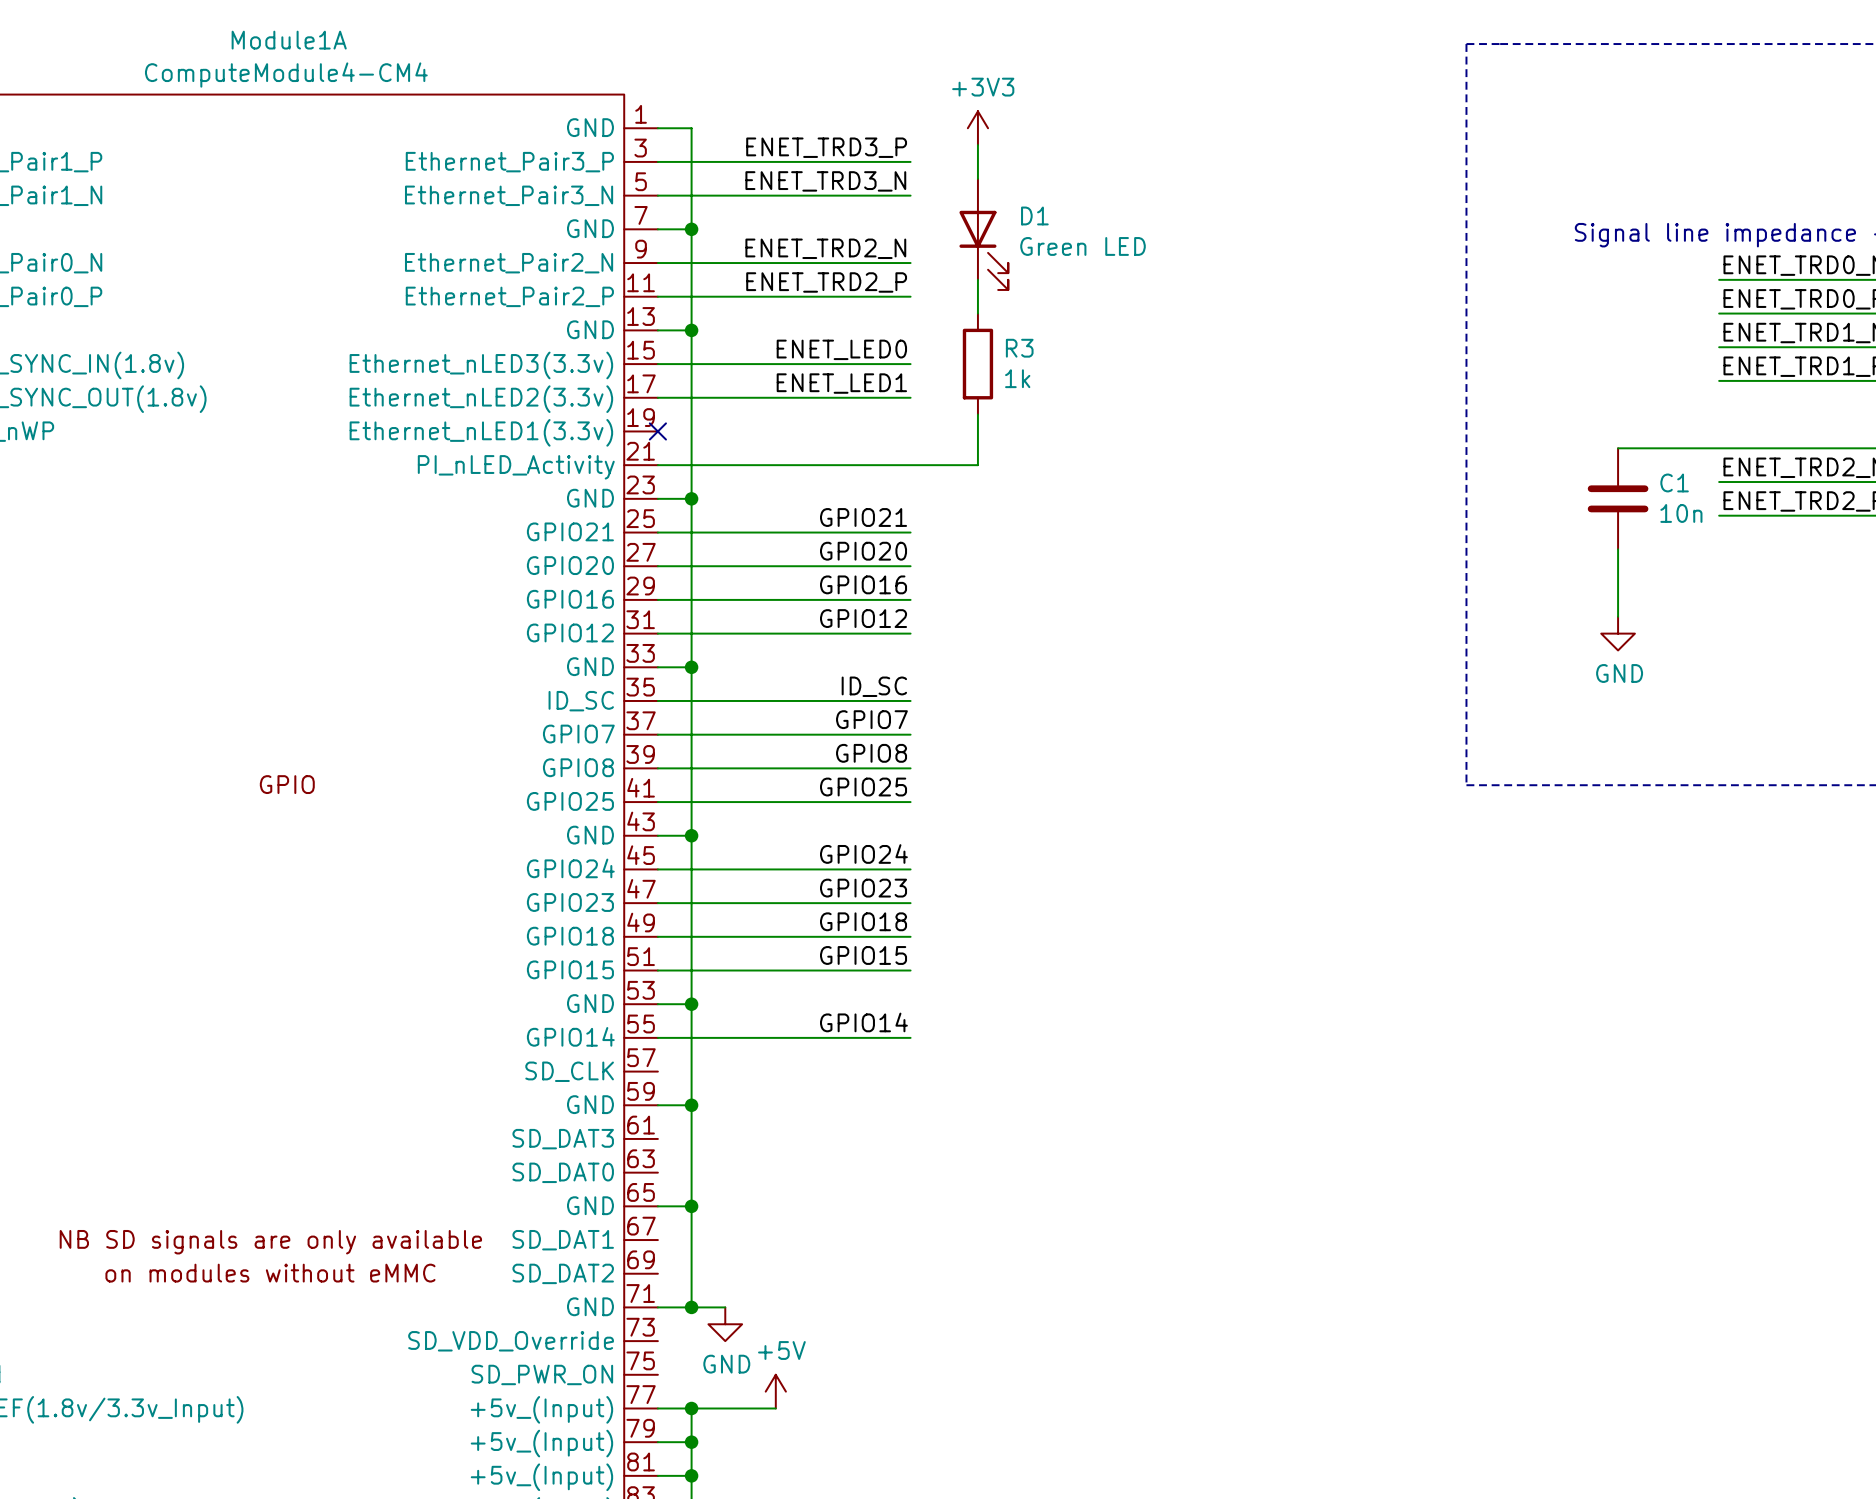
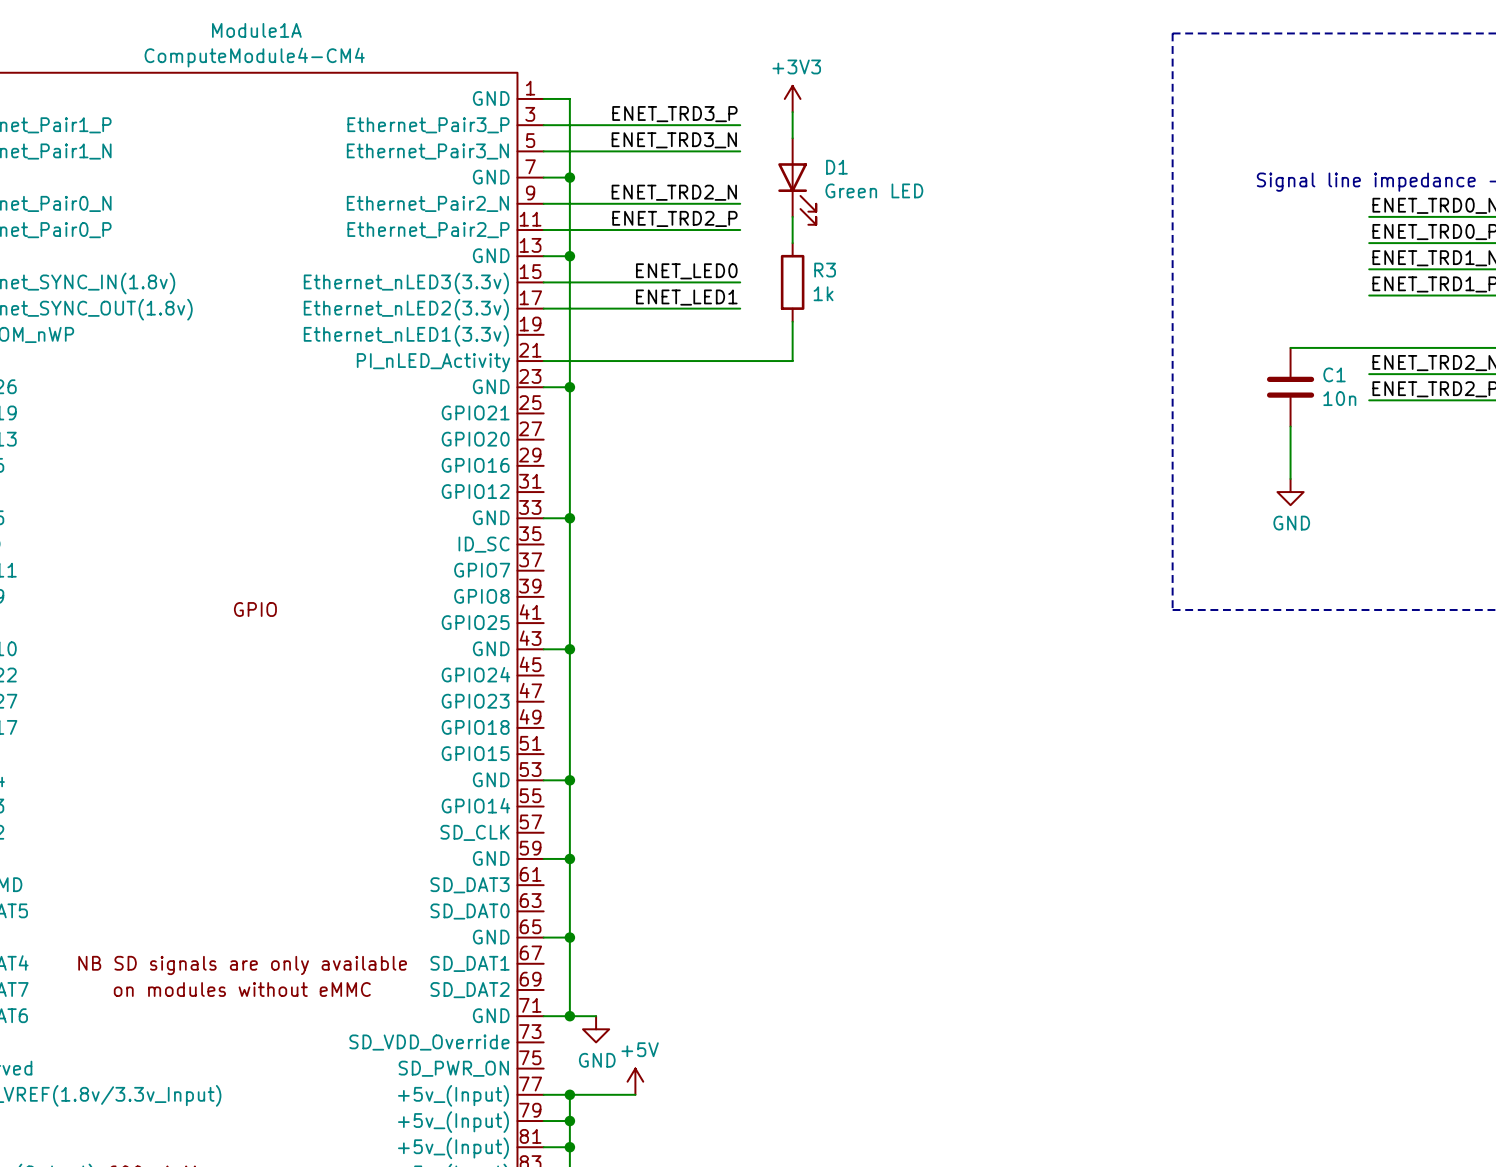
no-connect mark: (657, 431) -> none
label: GPIO21 (863, 517) -> none
wire: (657, 532) (910, 532) -> none
label: GPIO20 (863, 551) -> none
wire: (657, 566) (910, 566) -> none
label: GPIO16 (863, 584) -> none
wire: (657, 599) (910, 599) -> none
label: GPIO12 (863, 618) -> none
wire: (657, 633) (910, 633) -> none
label: ID_SC (874, 686) -> none
wire: (657, 700) (910, 700) -> none
label: GPIO7 (871, 719) -> none
wire: (657, 734) (910, 734) -> none
label: GPIO8 (871, 753) -> none
wire: (657, 768) (910, 768) -> none
label: GPIO25 (863, 787) -> none
wire: (657, 802) (910, 802) -> none
label: GPIO24 (863, 854) -> none
wire: (657, 869) (910, 869) -> none
label: GPIO23 (863, 888) -> none
wire: (657, 903) (910, 903) -> none
label: GPIO18 (863, 921) -> none
wire: (657, 936) (910, 936) -> none
label: GPIO15 (863, 955) -> none
wire: (657, 970) (910, 970) -> none
label: GPIO14 (863, 1022) -> none
wire: (657, 1037) (910, 1037) -> none

